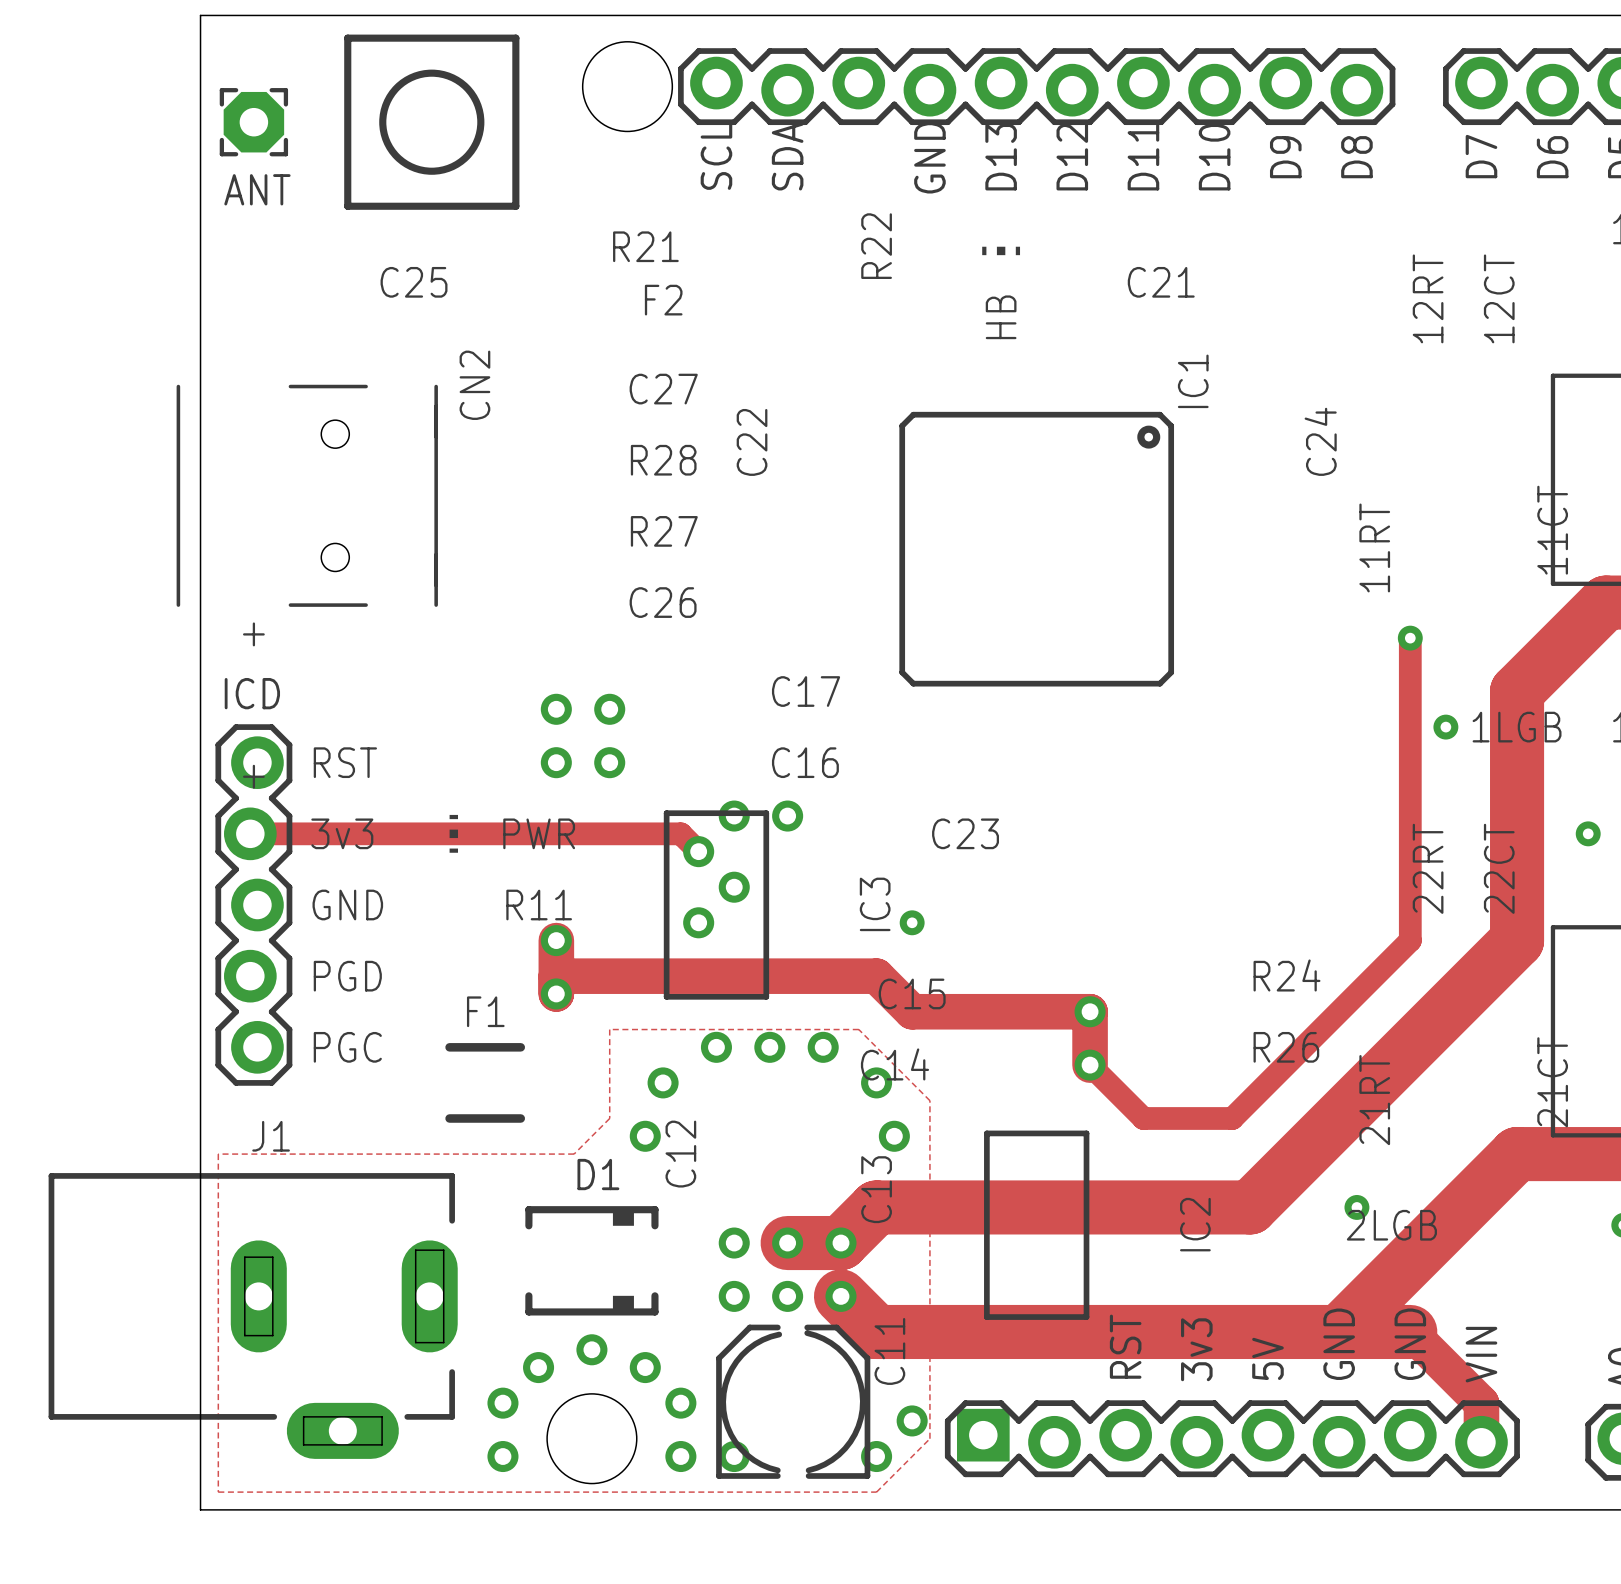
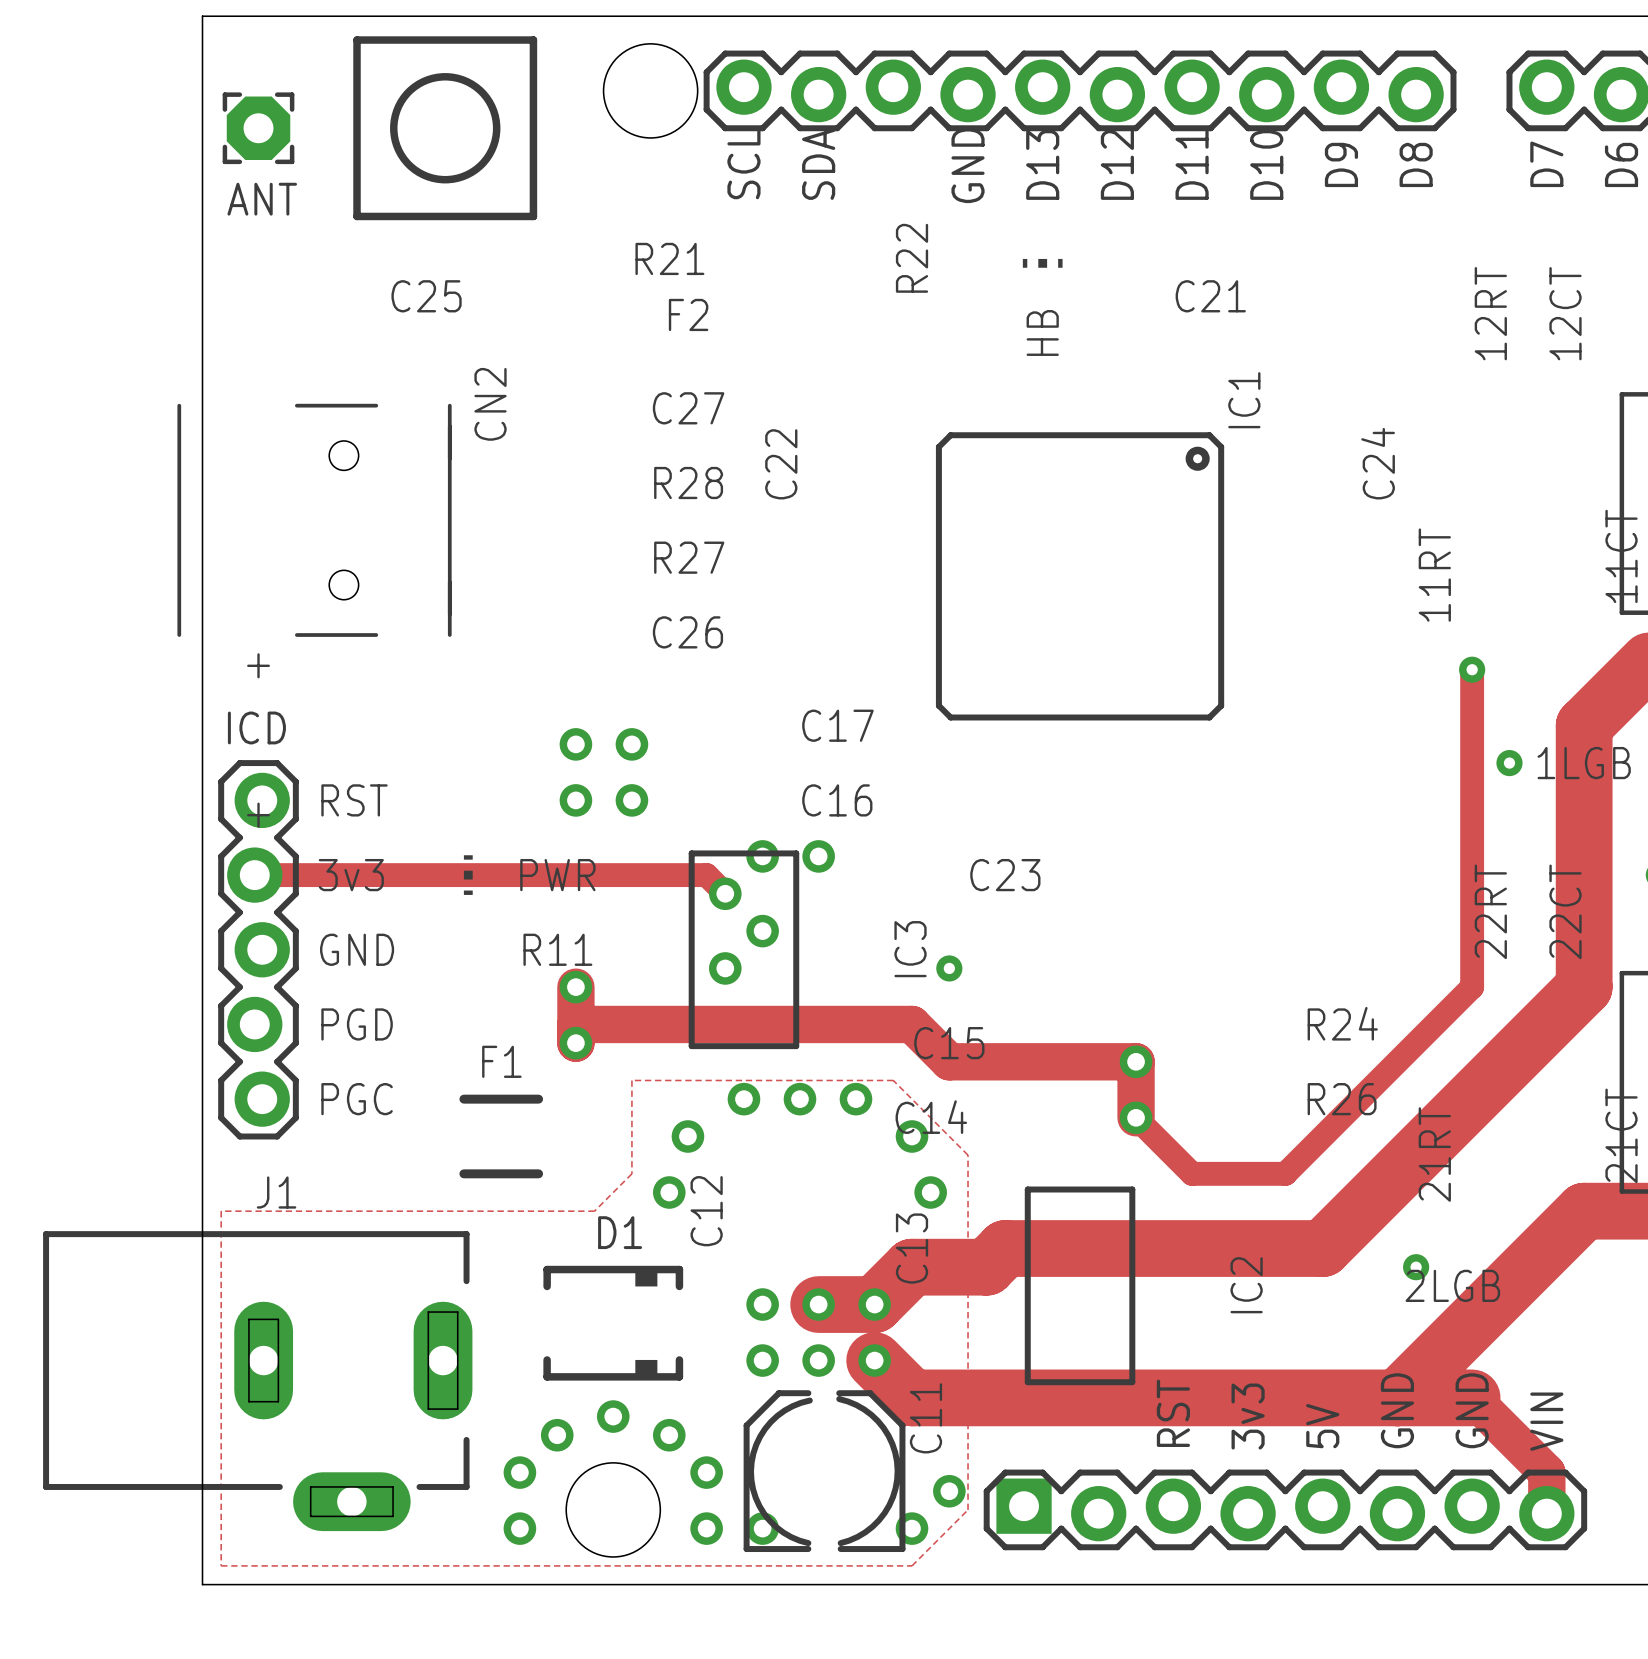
track: (1267, 1189) (1250, 1207) (947, 1207) -> (1322, 1248) (1005, 1248) (986, 1267)

